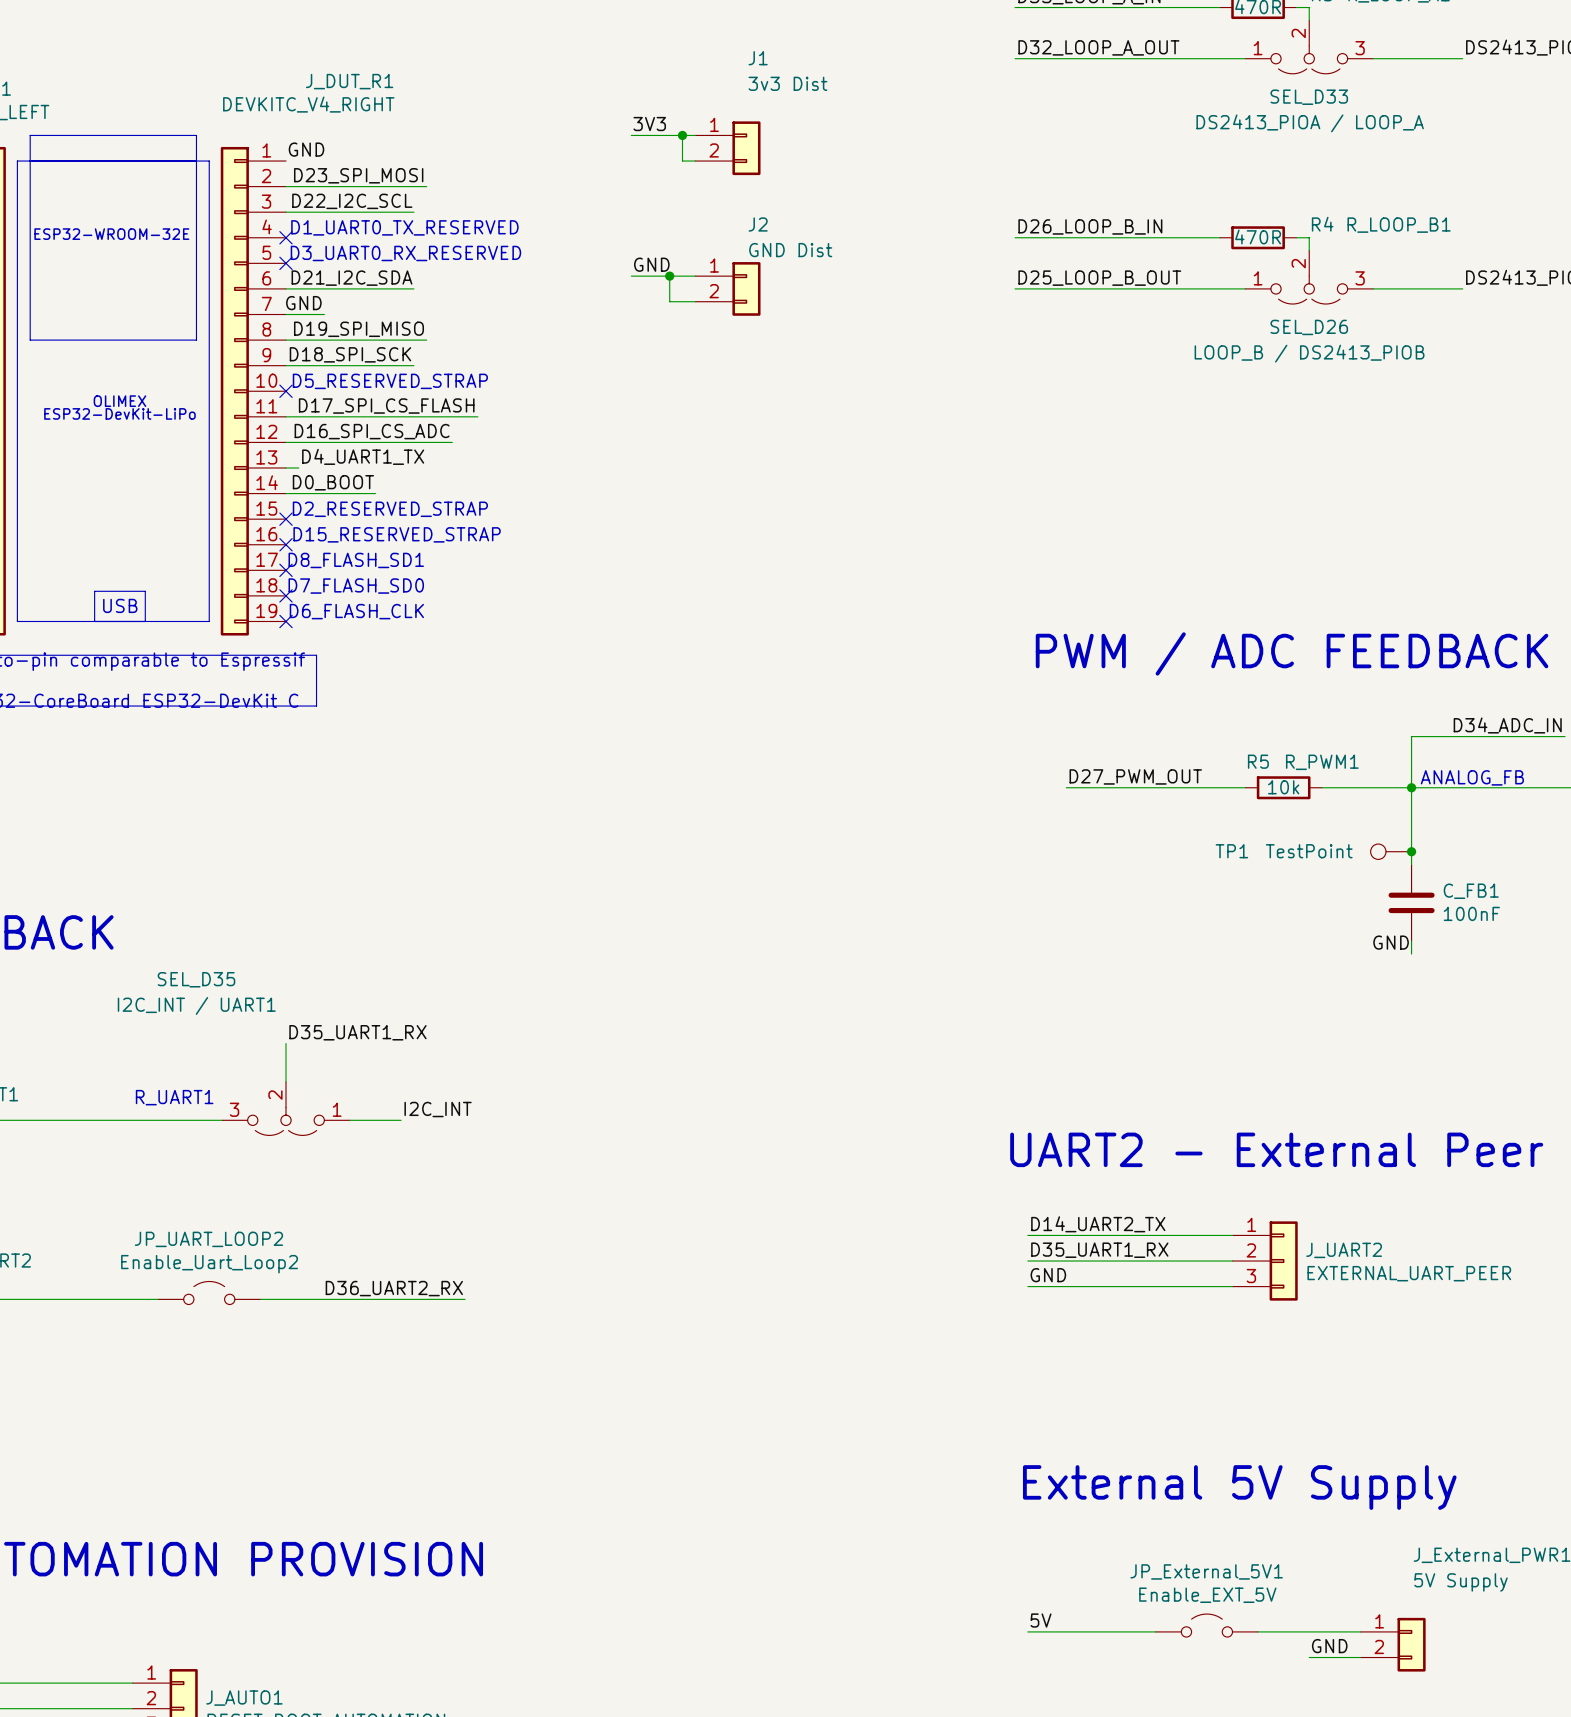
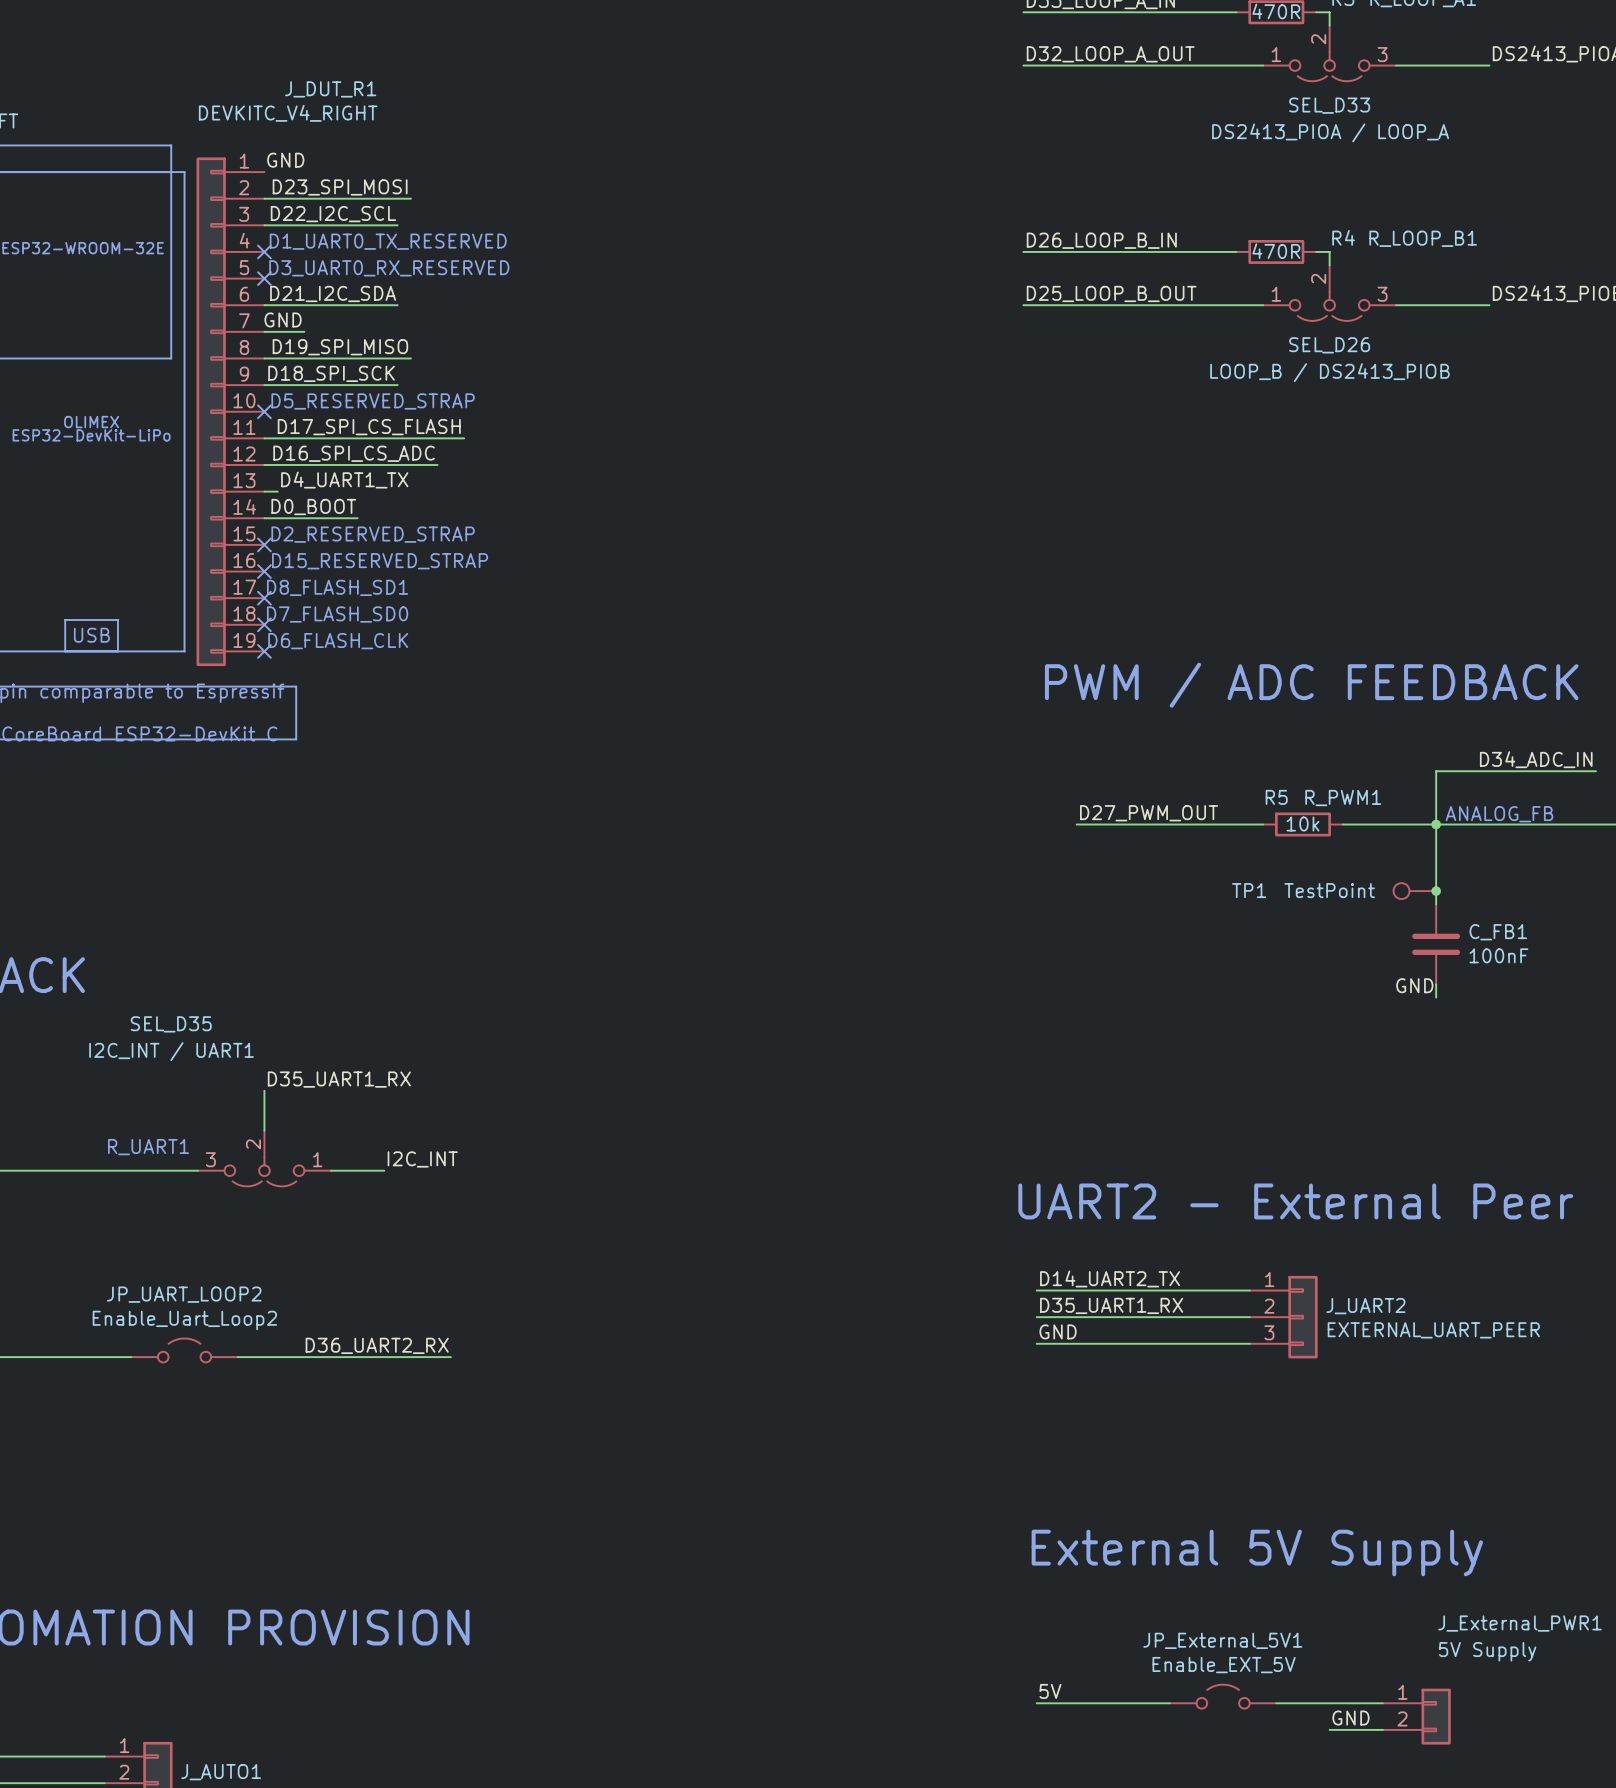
label: 3V3 (649, 124) -> none
wire: (631, 135) (695, 135) -> none
wire: (682, 135) (682, 161) (695, 161) -> none
junction: (682, 135) -> none
J1: 3v3 Dist (727, 148) -> none
label: GND (651, 264) -> none
wire: (631, 276) (695, 276) -> none
wire: (669, 276) (669, 301) (695, 301) -> none
junction: (669, 276) -> none
J2: GND Dist (727, 288) -> none

